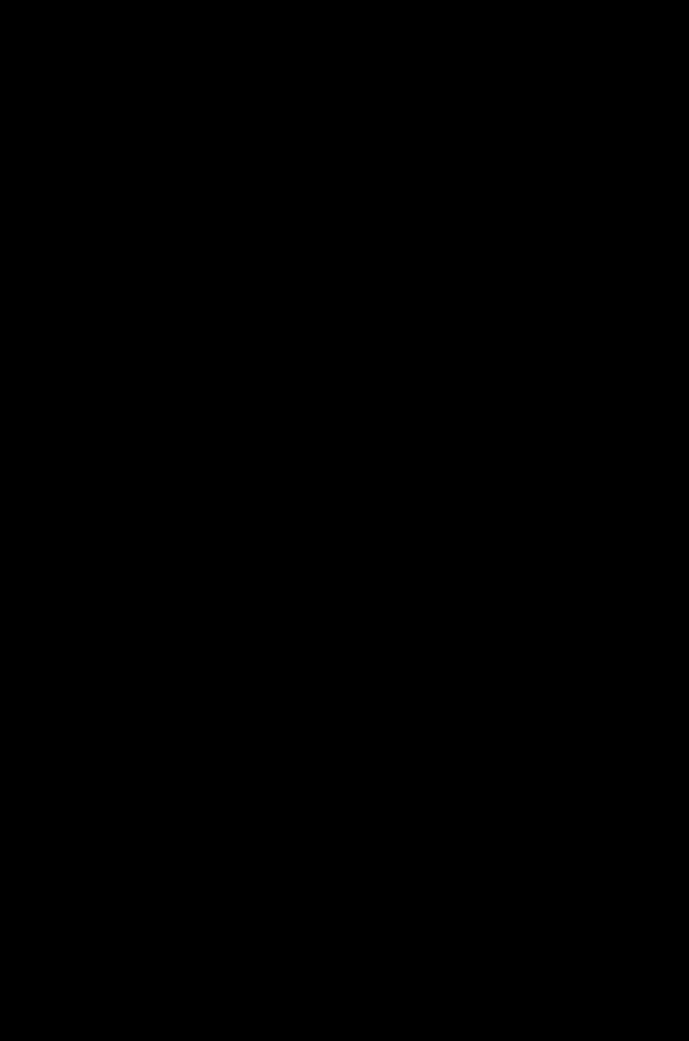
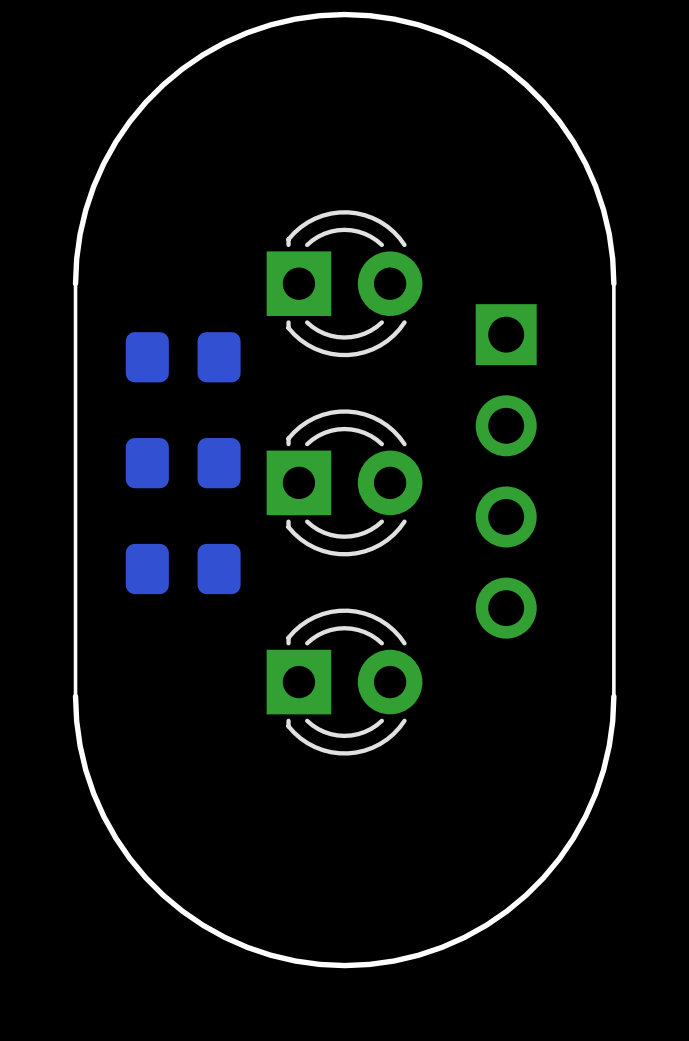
board edge: none -> (75, 283) (76, 721) (85, 770) (93, 793) (115, 838) (145, 877) (182, 911) (224, 937) (247, 947) (295, 961) (344, 965) (394, 961) (441, 947) (486, 925) (506, 911) (543, 877) (573, 838) (595, 793) (603, 770) (612, 721) (612, 258) (603, 210) (595, 186) (573, 141) (543, 102) (506, 68) (464, 42) (441, 32) (394, 19) (344, 14) (319, 15) (271, 24) (247, 32) (202, 54) (163, 84) (129, 121) (103, 163) (85, 210) (76, 258) (75, 283)
part: none -> (344, 283)
part: none -> (183, 357)
part: none -> (183, 463)
part: none -> (506, 471)
part: none -> (344, 482)
part: none -> (183, 569)
part: none -> (344, 682)

